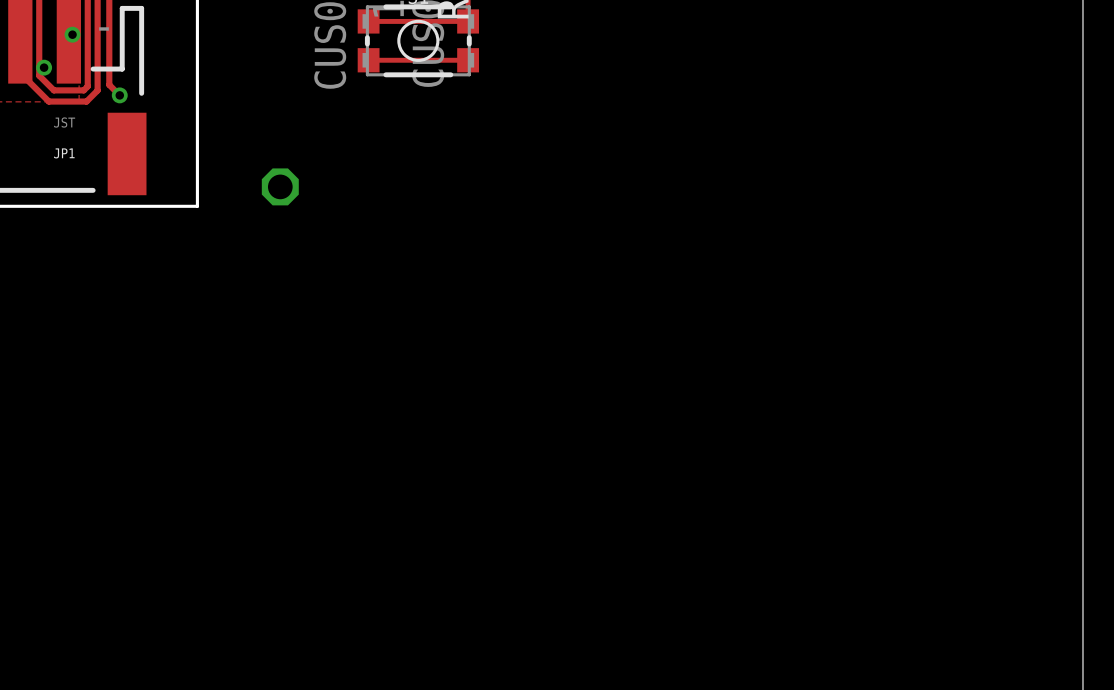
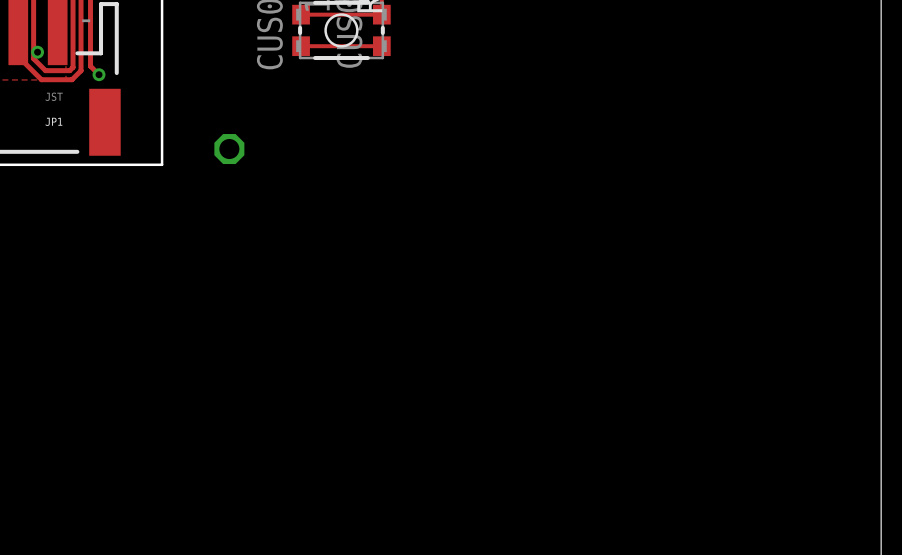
via: (72, 34) -> none

